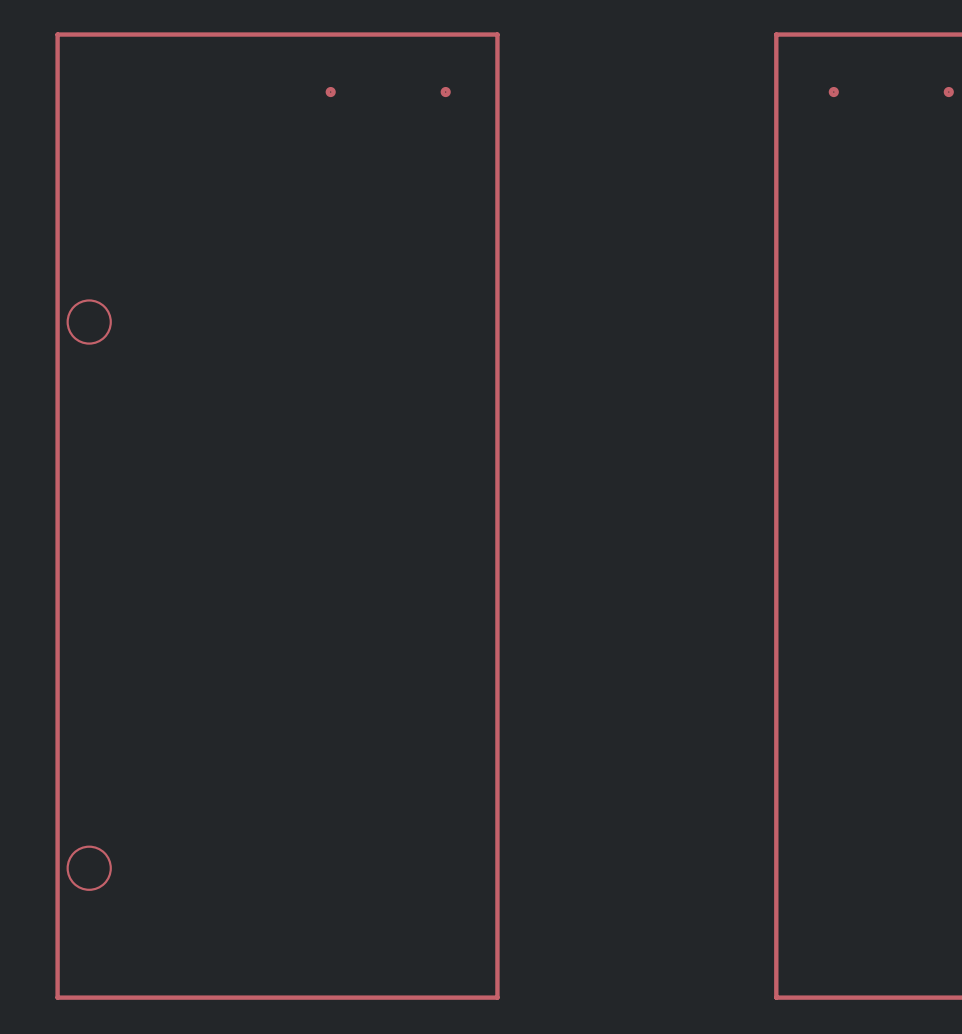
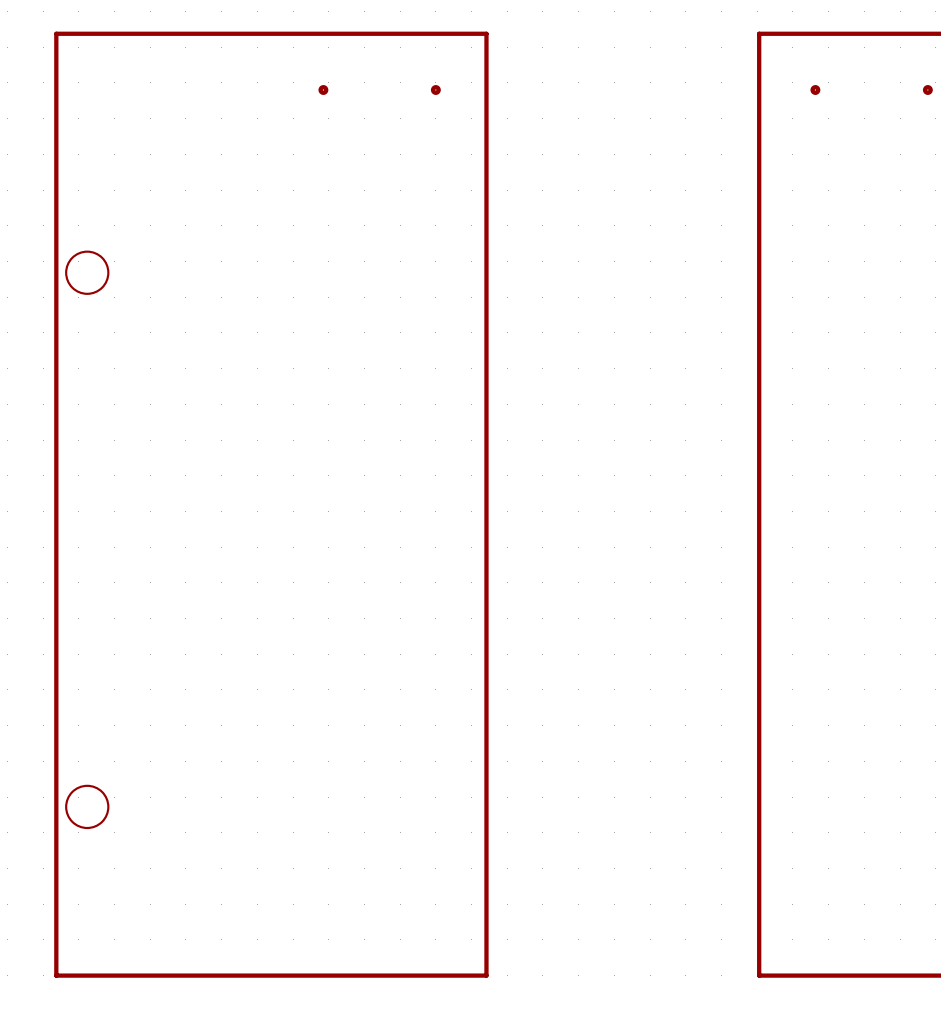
drawing position: (89, 322) -> (87, 272)
drawing position: (89, 868) -> (87, 806)

